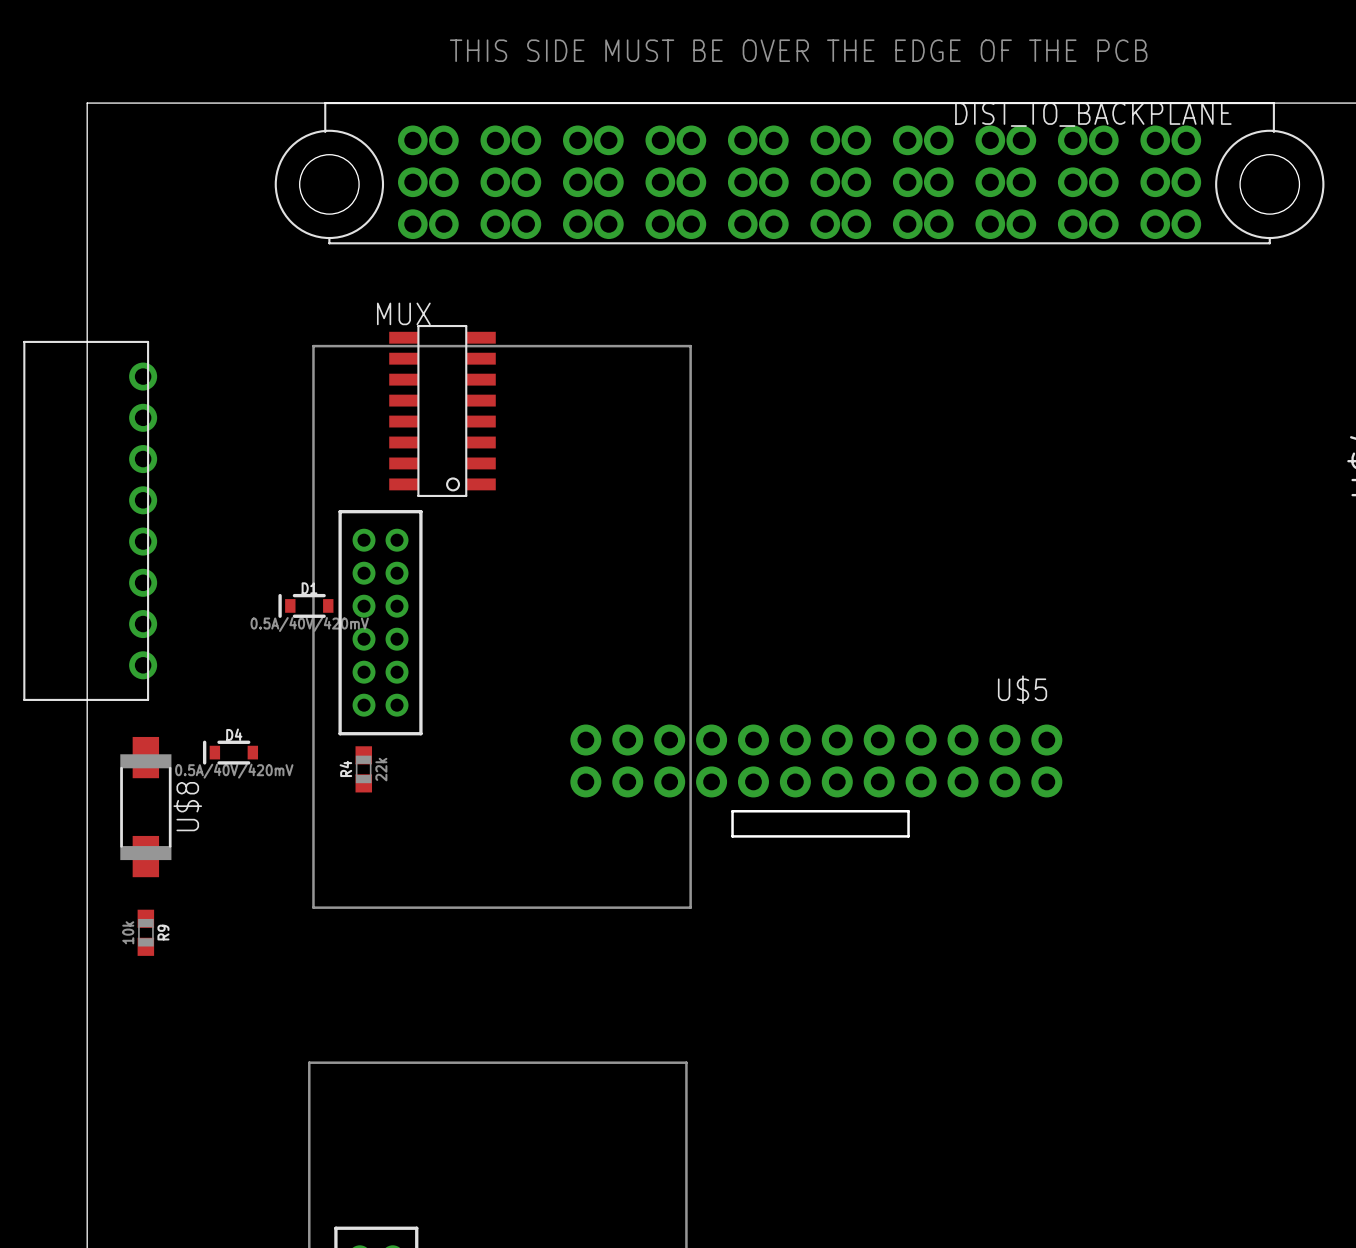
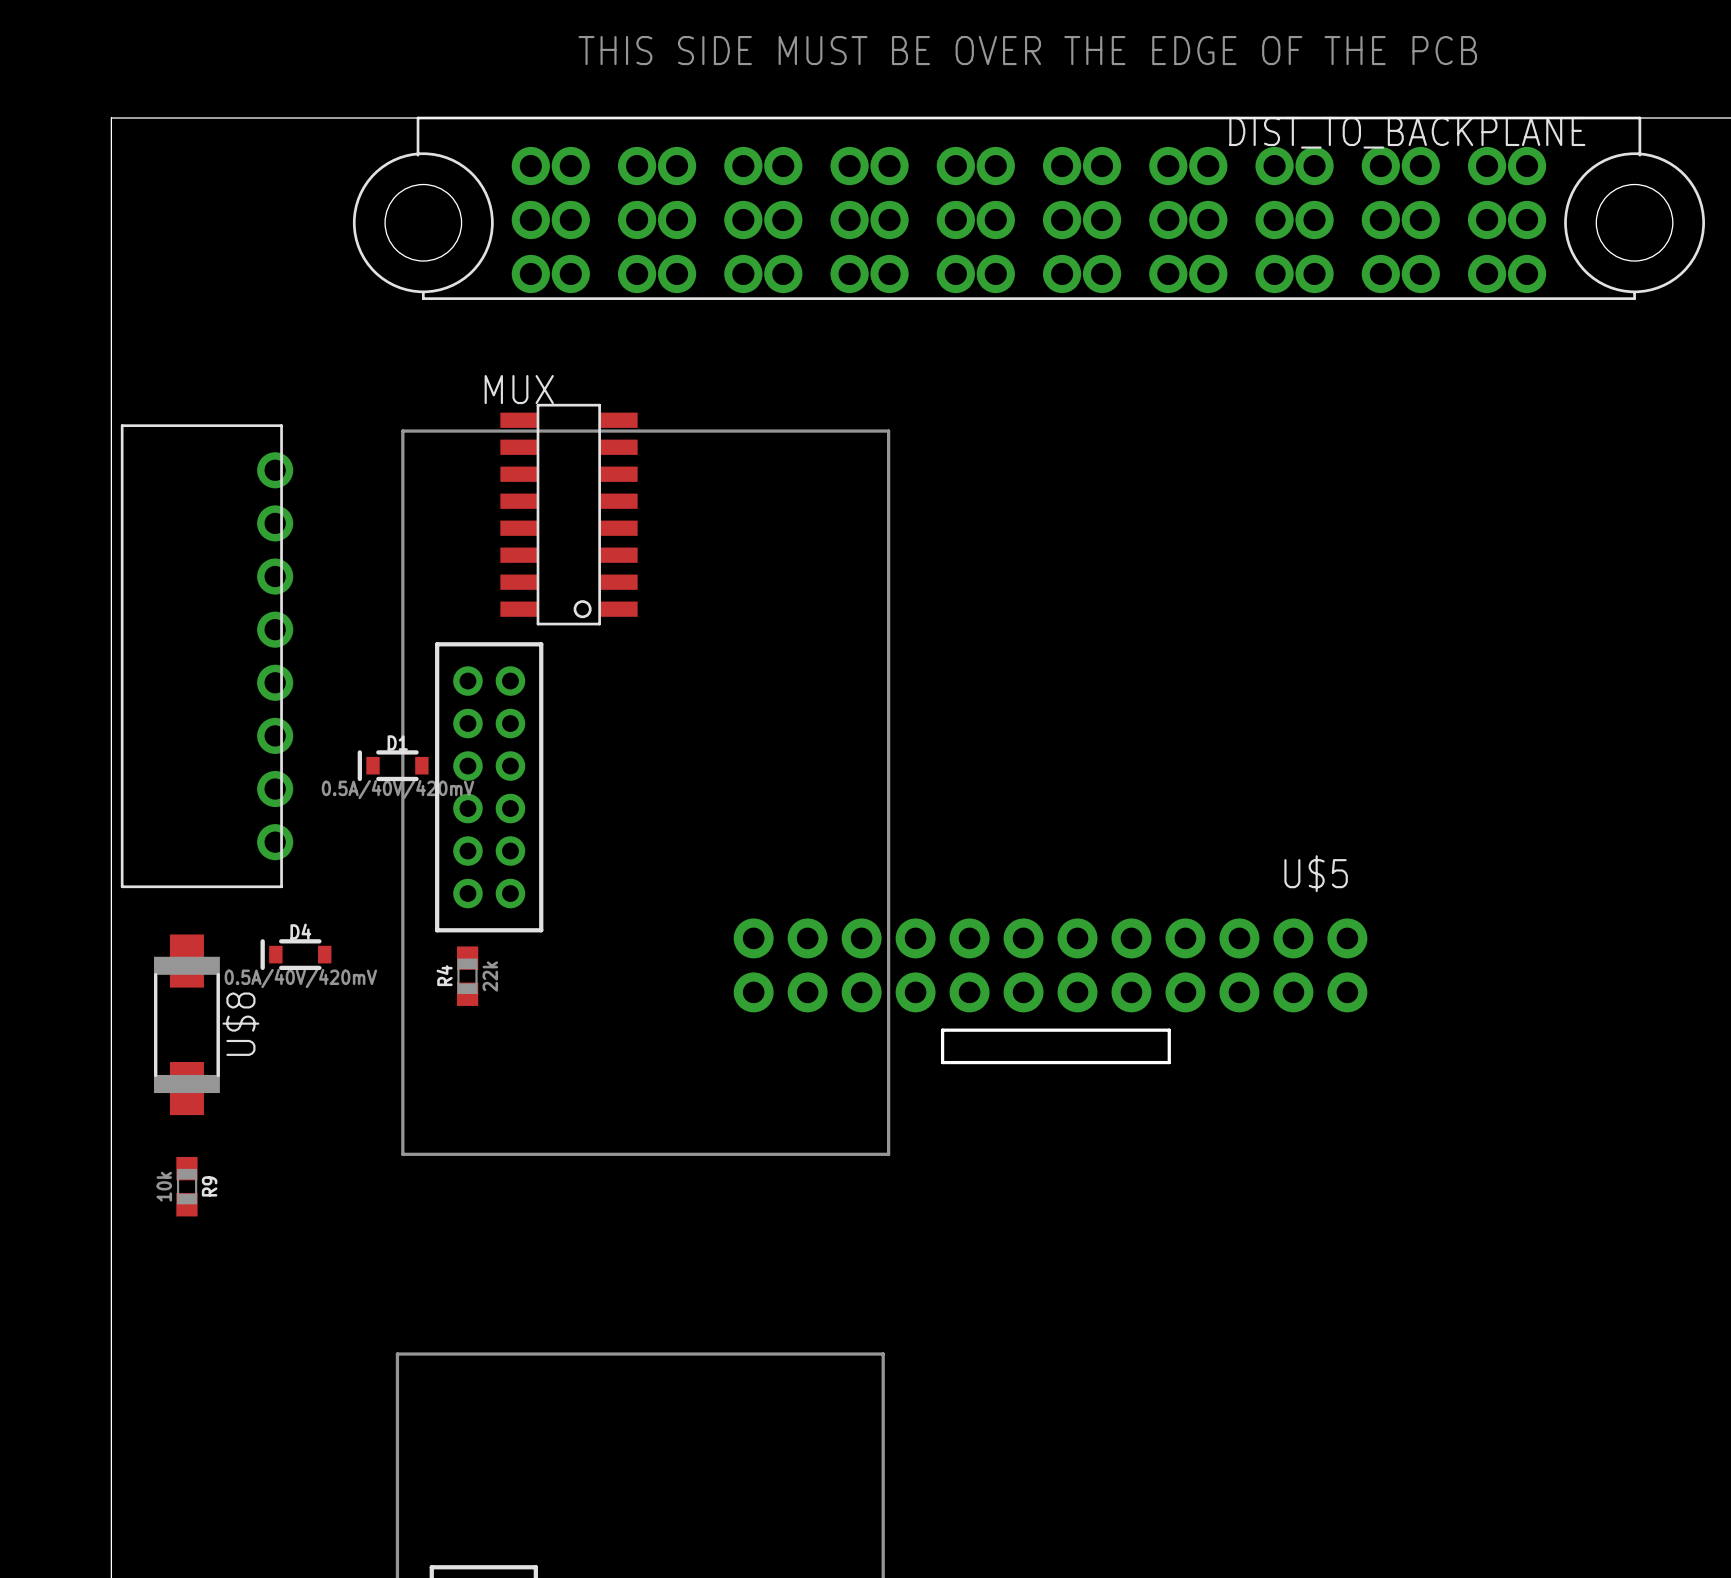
part position: (90, 520) -> (207, 656)

